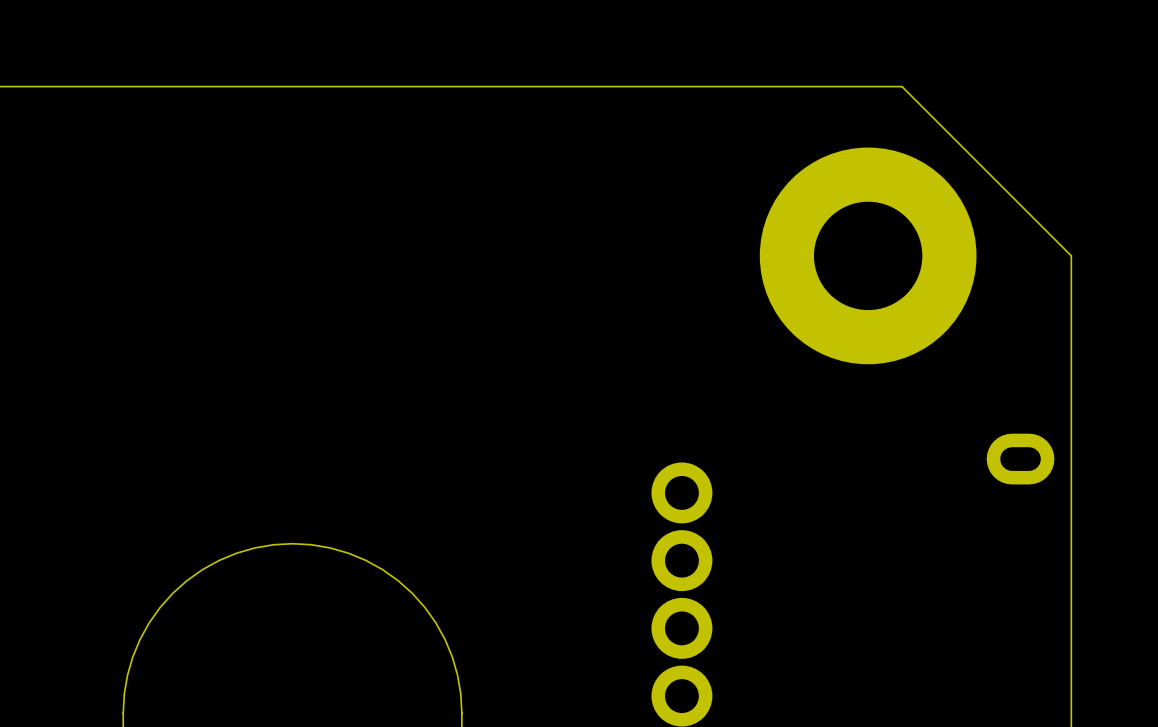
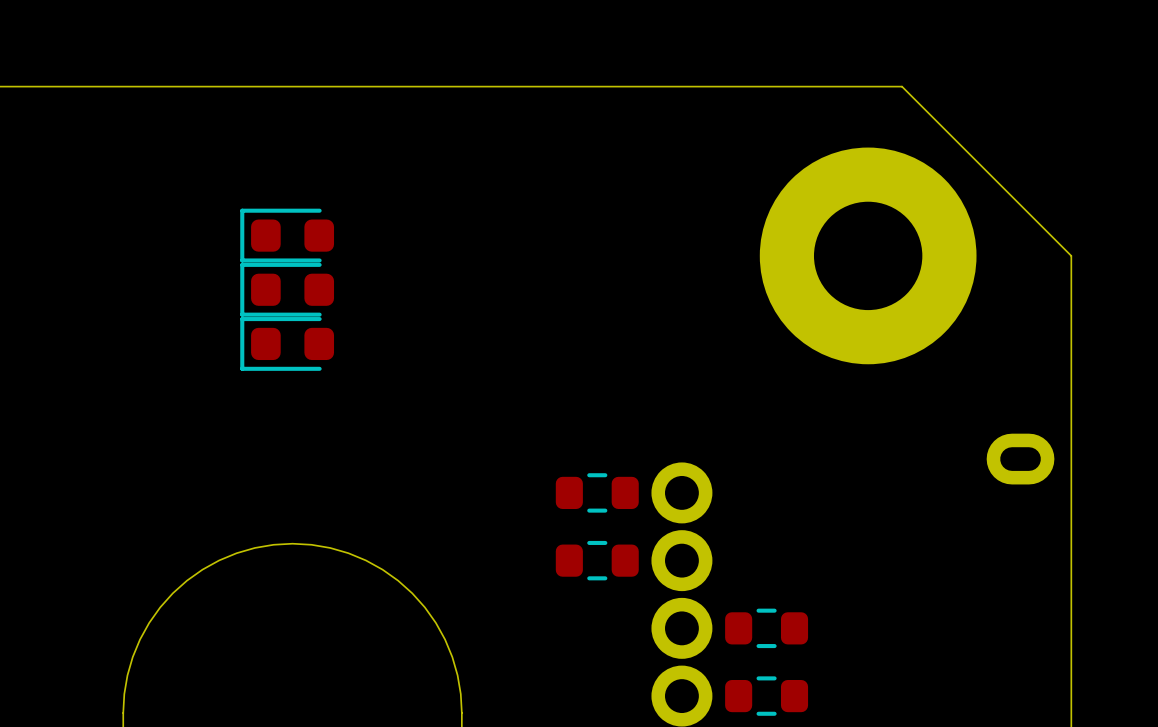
part: none -> (287, 235)
part: none -> (287, 289)
part: none -> (287, 343)
part: none -> (597, 492)
part: none -> (597, 560)
part: none -> (766, 628)
part: none -> (766, 696)

